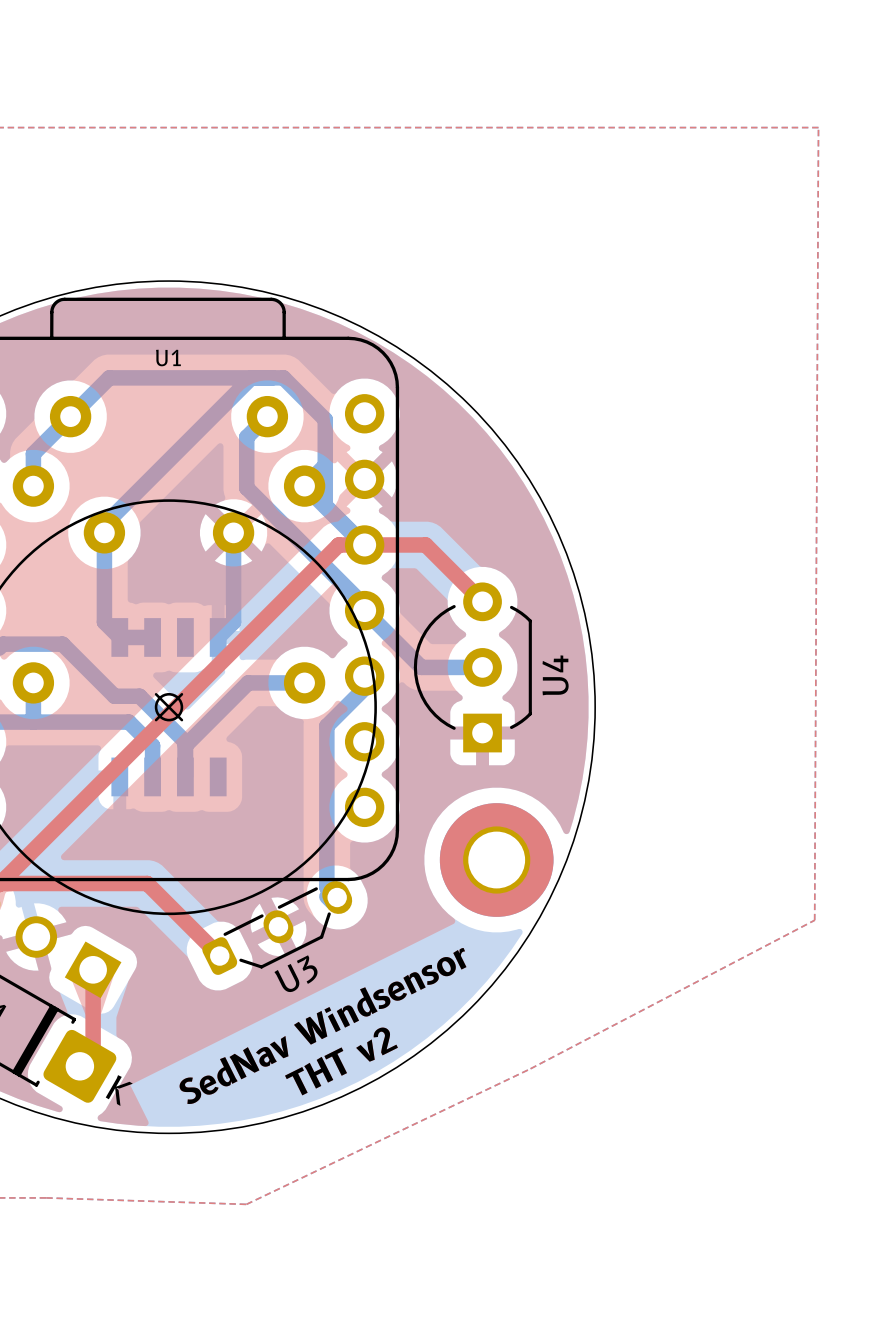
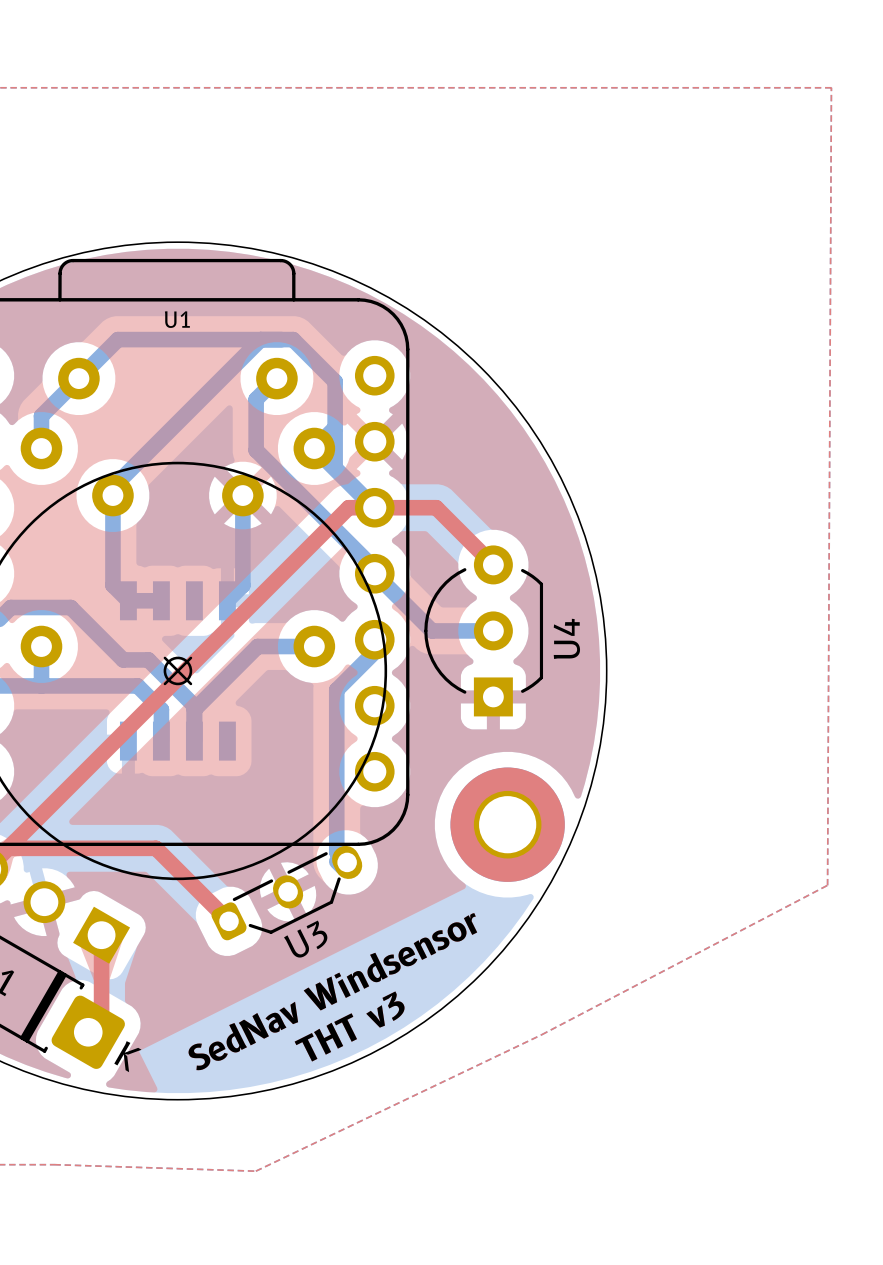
text: none -> THT v3 (349, 1026)
text: THT v2 (341, 1061) -> none

